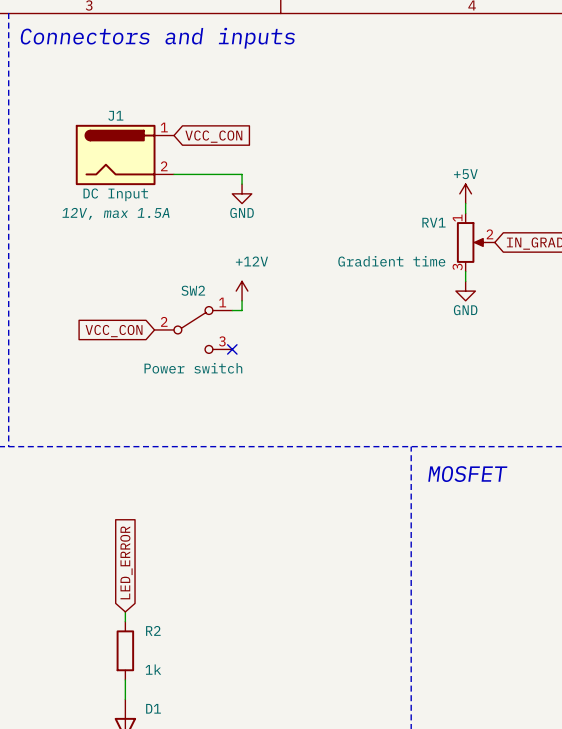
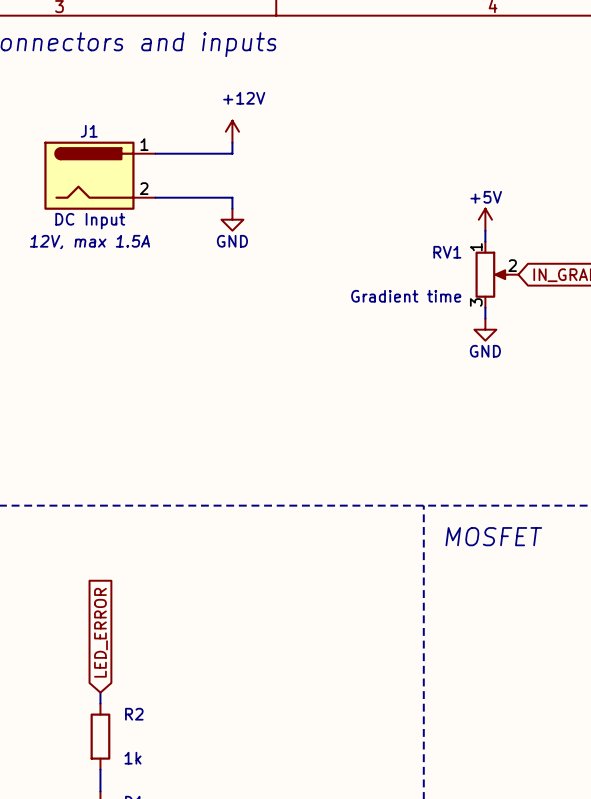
wire: none -> (232, 142) (232, 153) (155, 153)
global label: VCC_CON (213, 136) -> none
power symbol position: +12V (242, 291) -> +12V (232, 131)
wire: (242, 300) (242, 310) (232, 310) -> none
SW2: Power switch (193, 329) -> none
global label: VCC_CON (114, 331) -> none
no-connect mark: (232, 349) -> none

